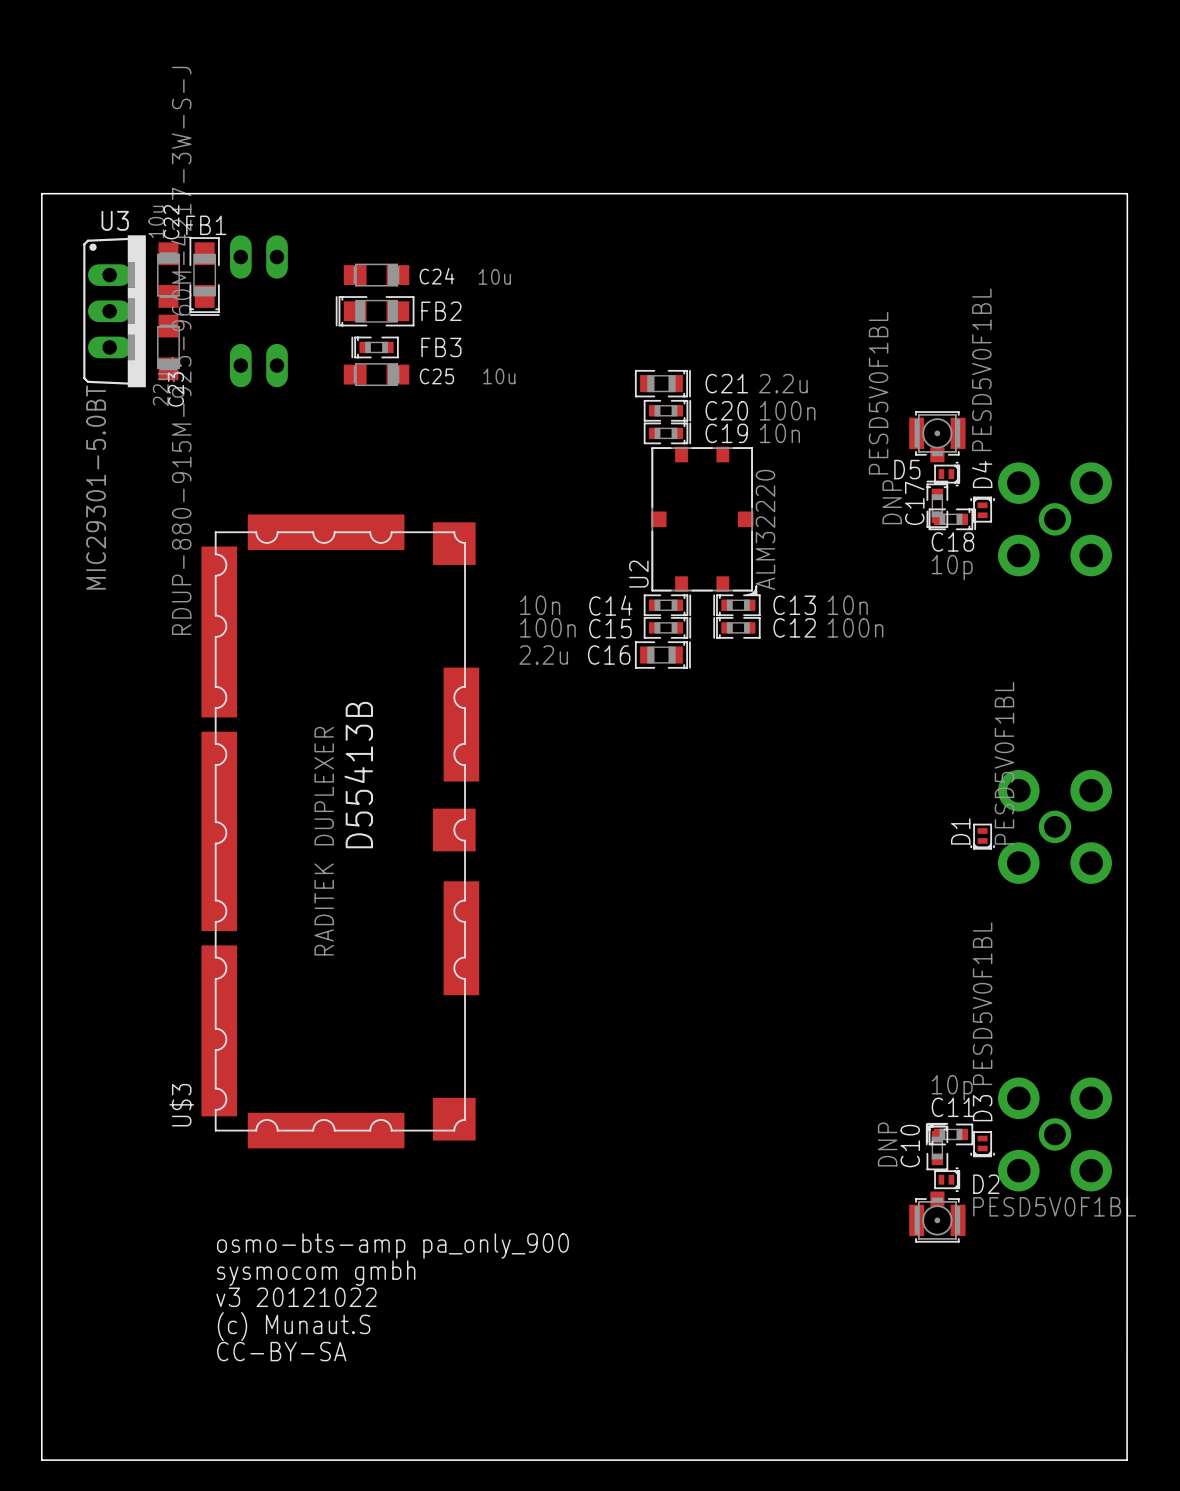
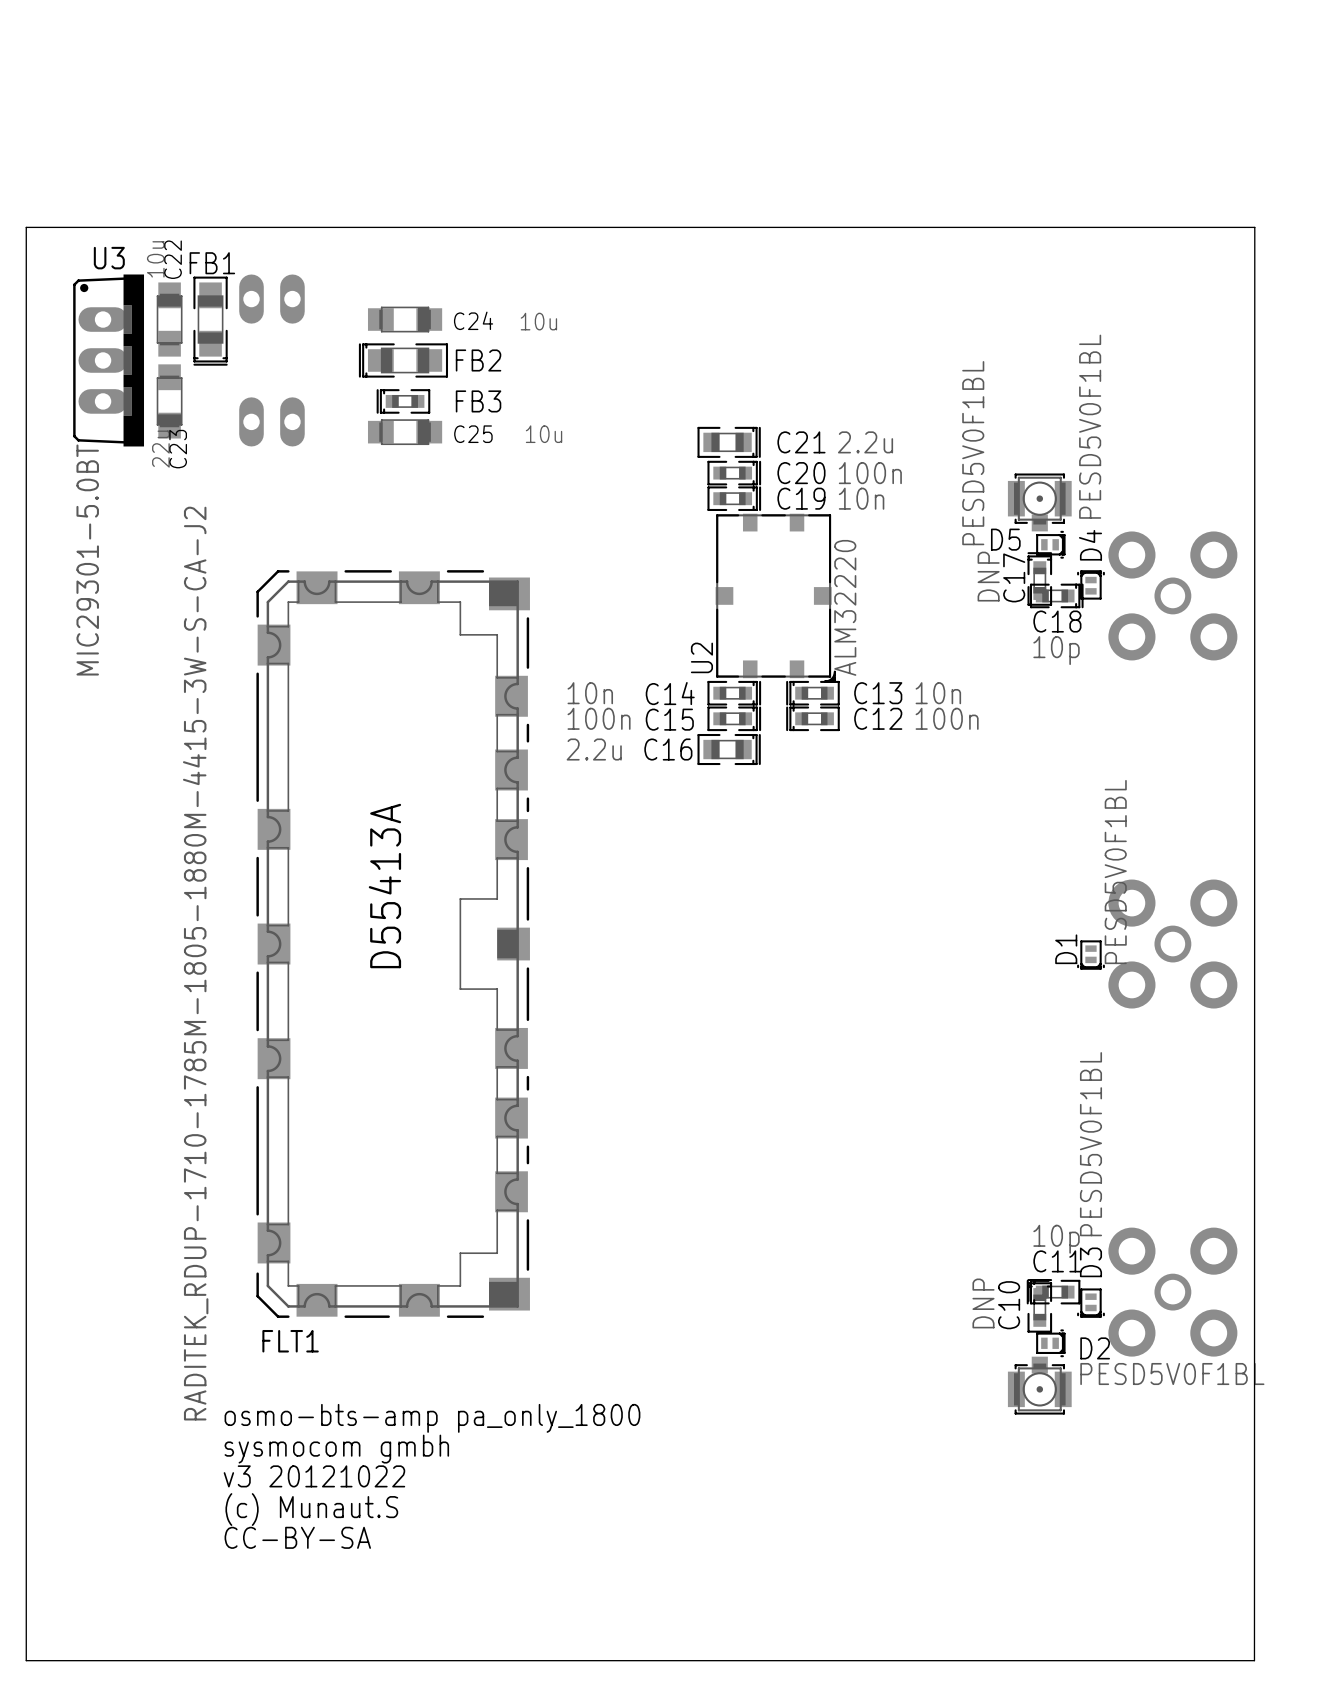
text: D55413B (358, 775) -> D55413A (384, 886)
FLT1: none -> RADITEK_RDUP-1710-1785M-1805-1880M-4415-3W-S-CA-J2 (393, 944)
U$3: RDUP-880-915M-925-960M-4217-3W-S-J (340, 831) -> none
text: osmo-bts-amp pa_only_900 (392, 1246) -> osmo-bts-amp pa_only_1800 (432, 1418)

